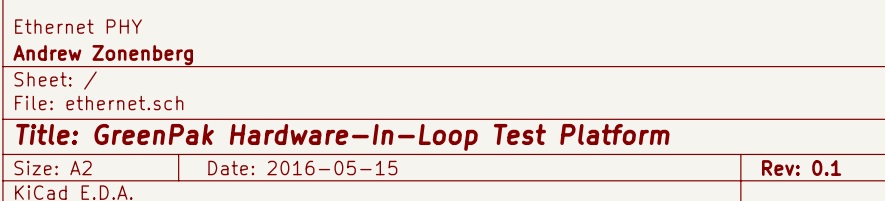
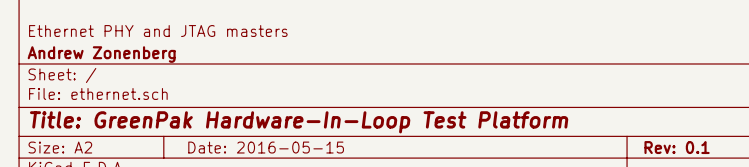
title block: Ethernet PHY (78, 26) -> Ethernet PHY and JTAG masters (158, 31)

